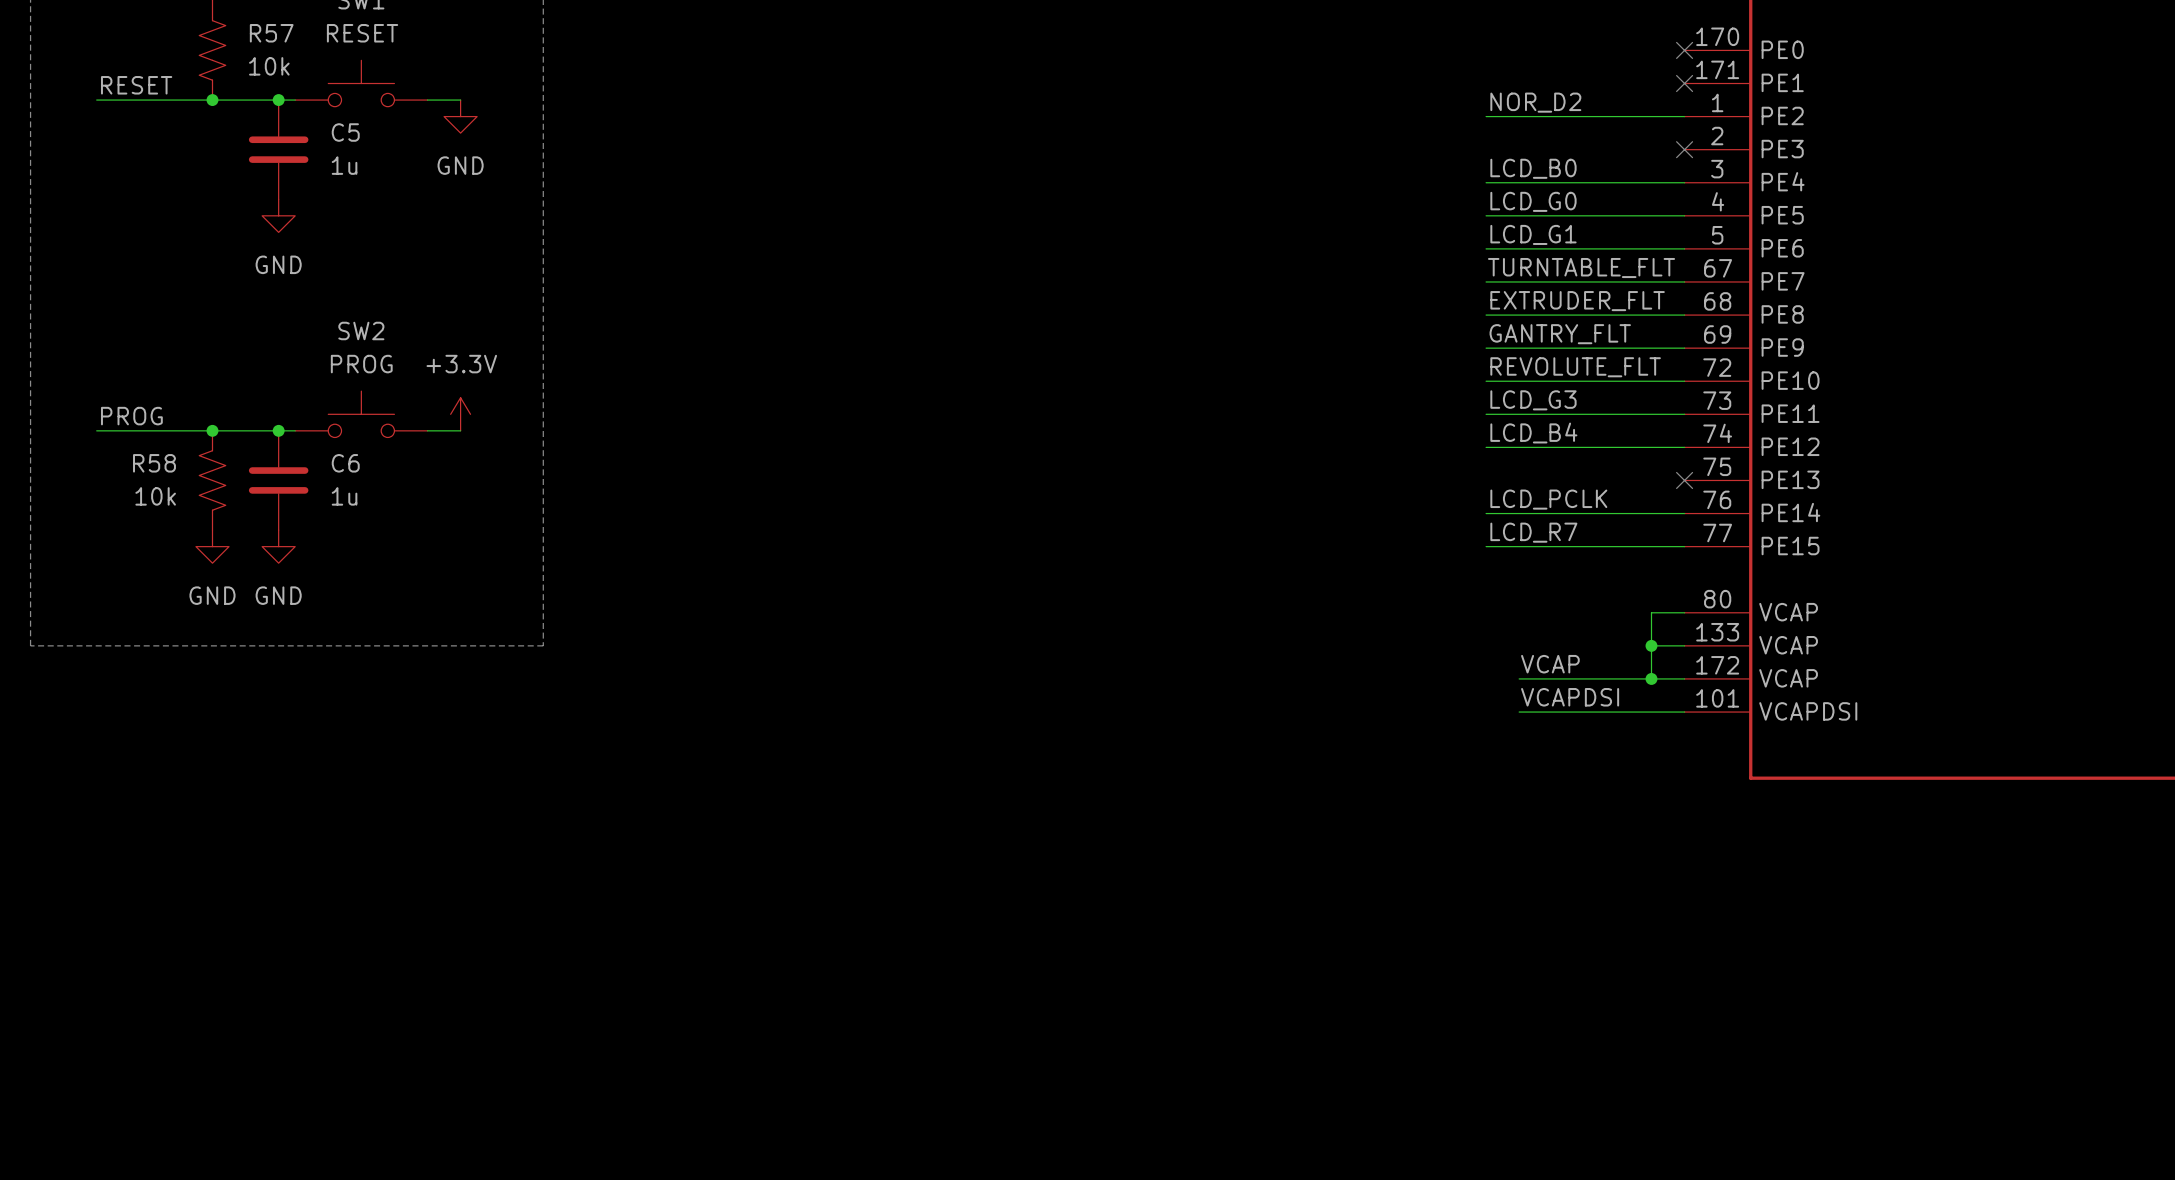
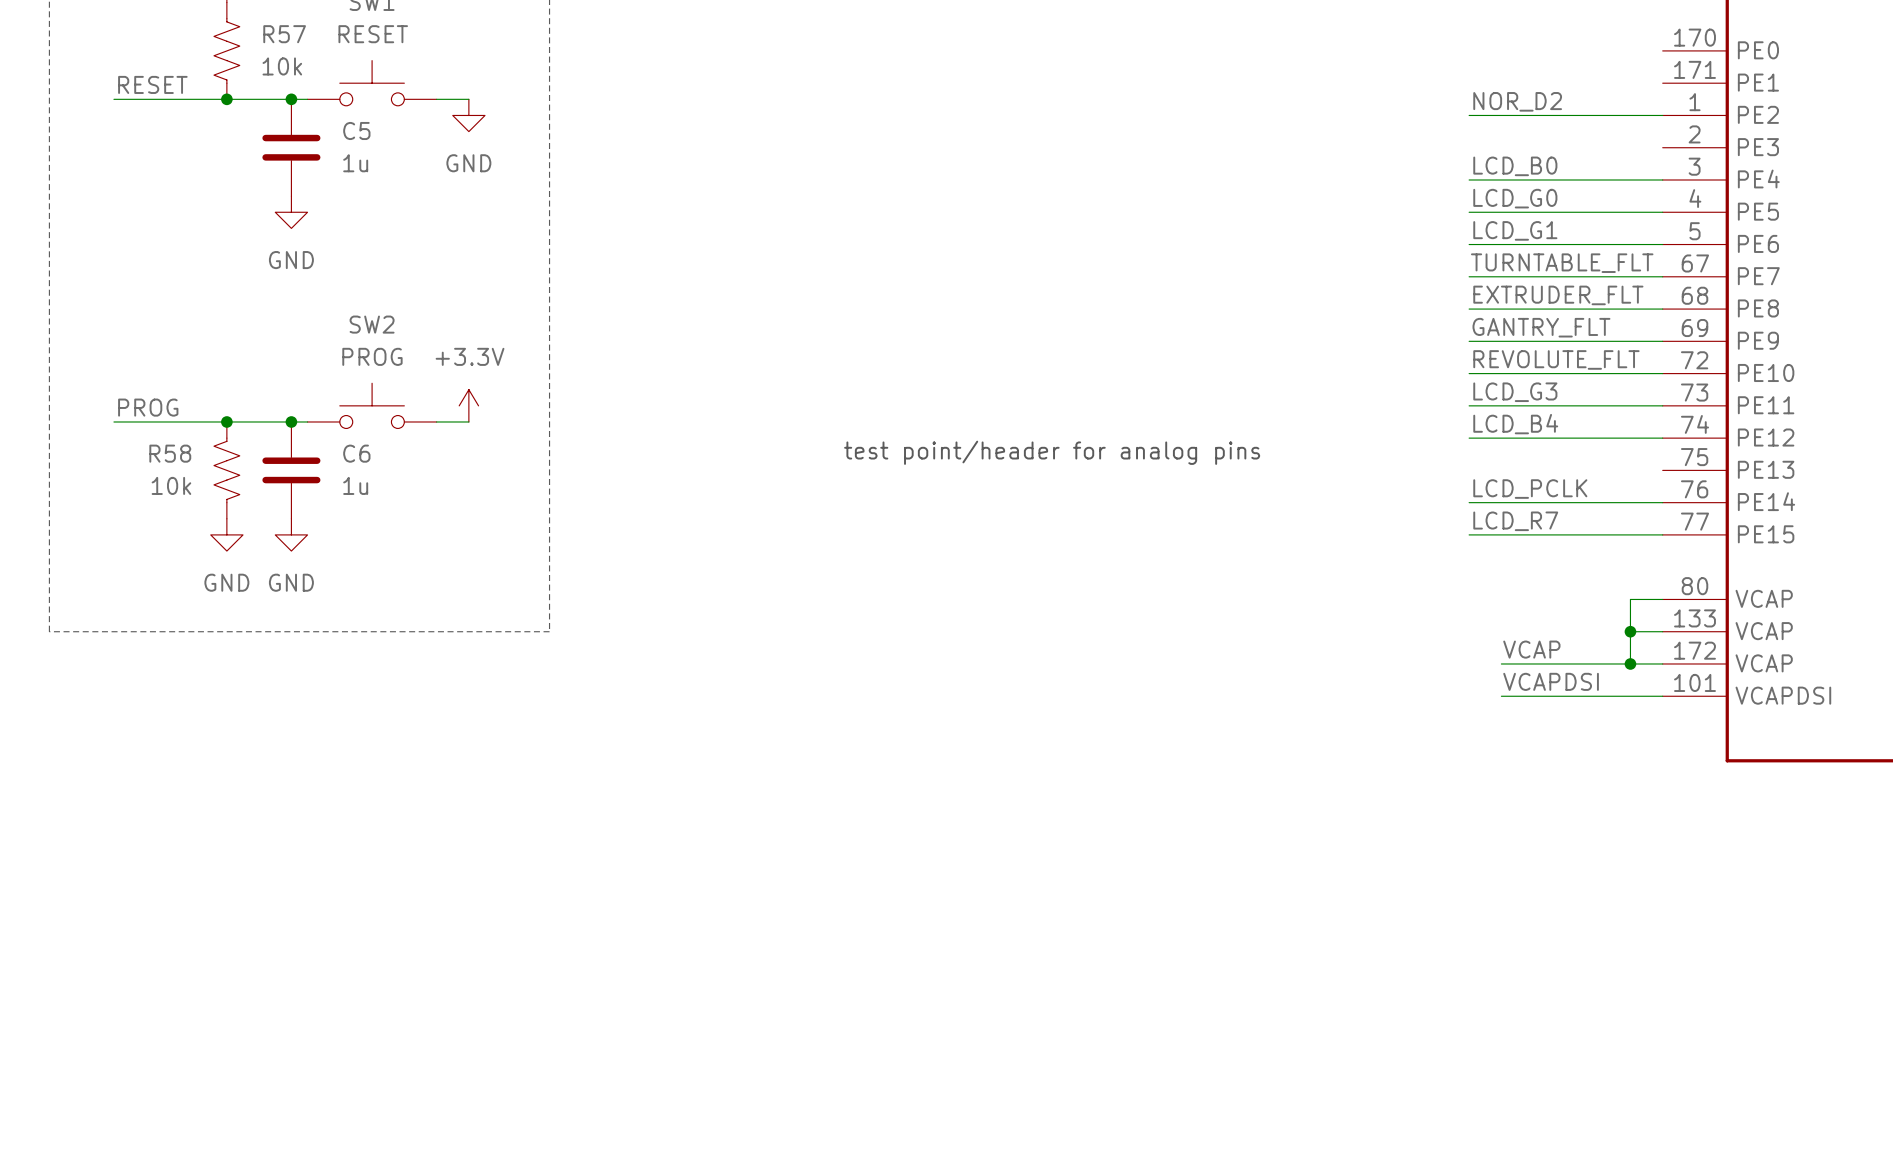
no-connect mark: (1684, 50) -> none
no-connect mark: (1684, 83) -> none
no-connect mark: (1684, 149) -> none
text: none -> test point/header for analog pins (1052, 452)
no-connect mark: (1684, 480) -> none

